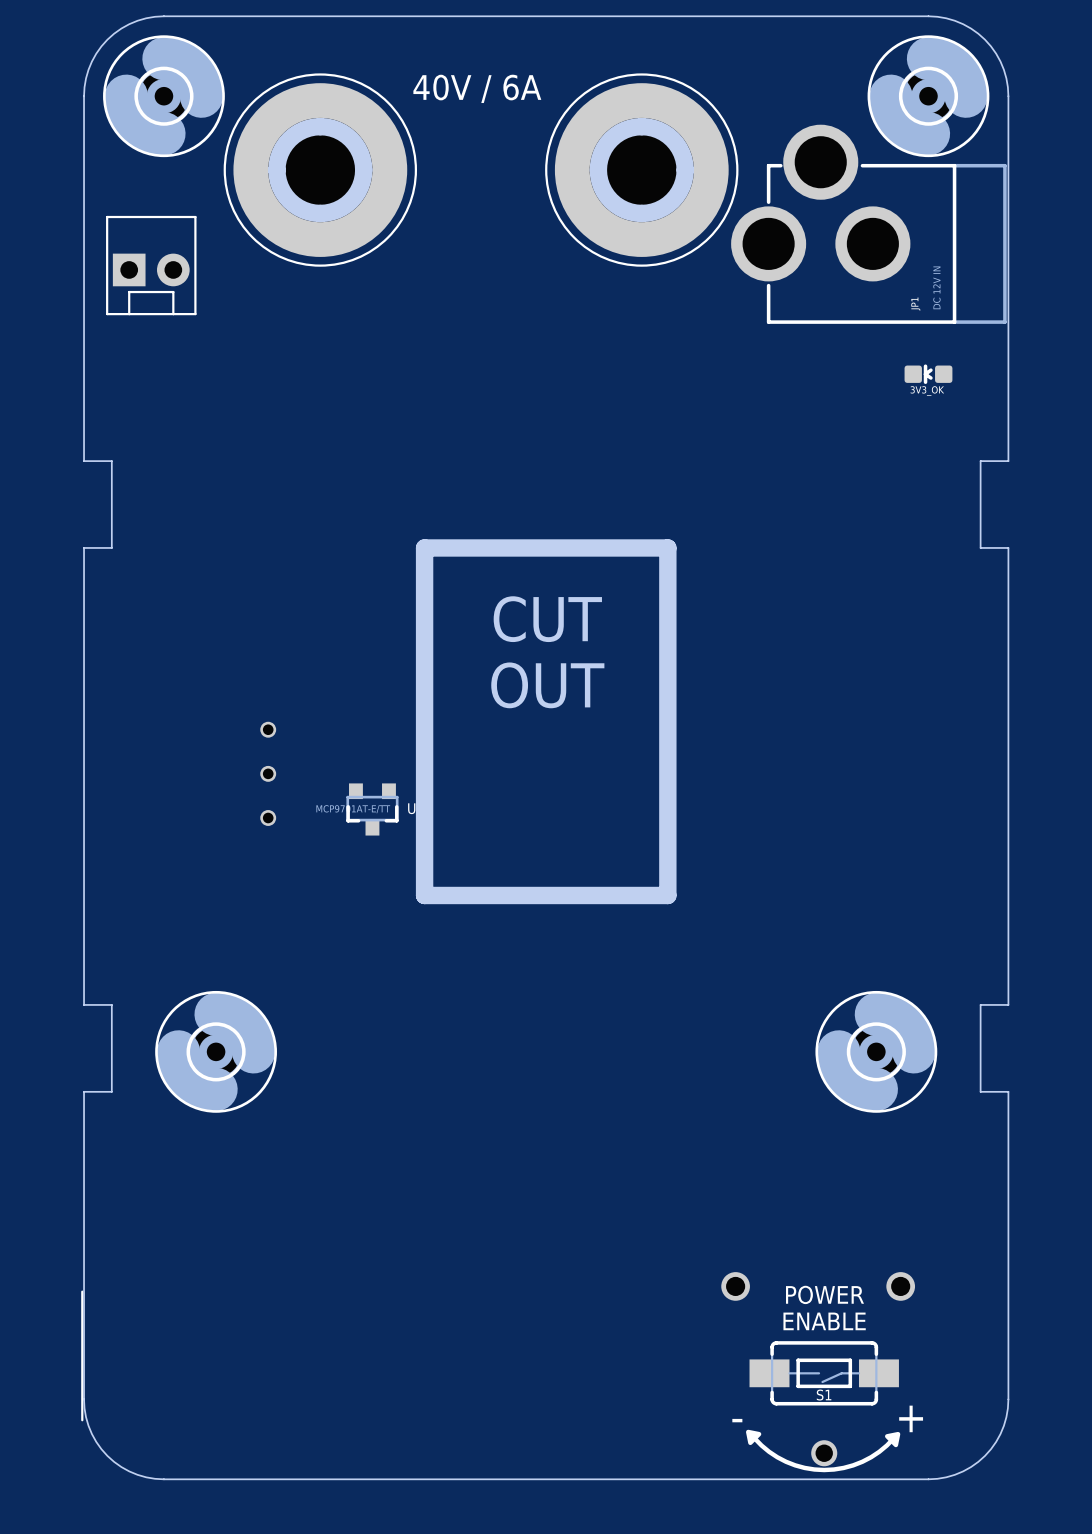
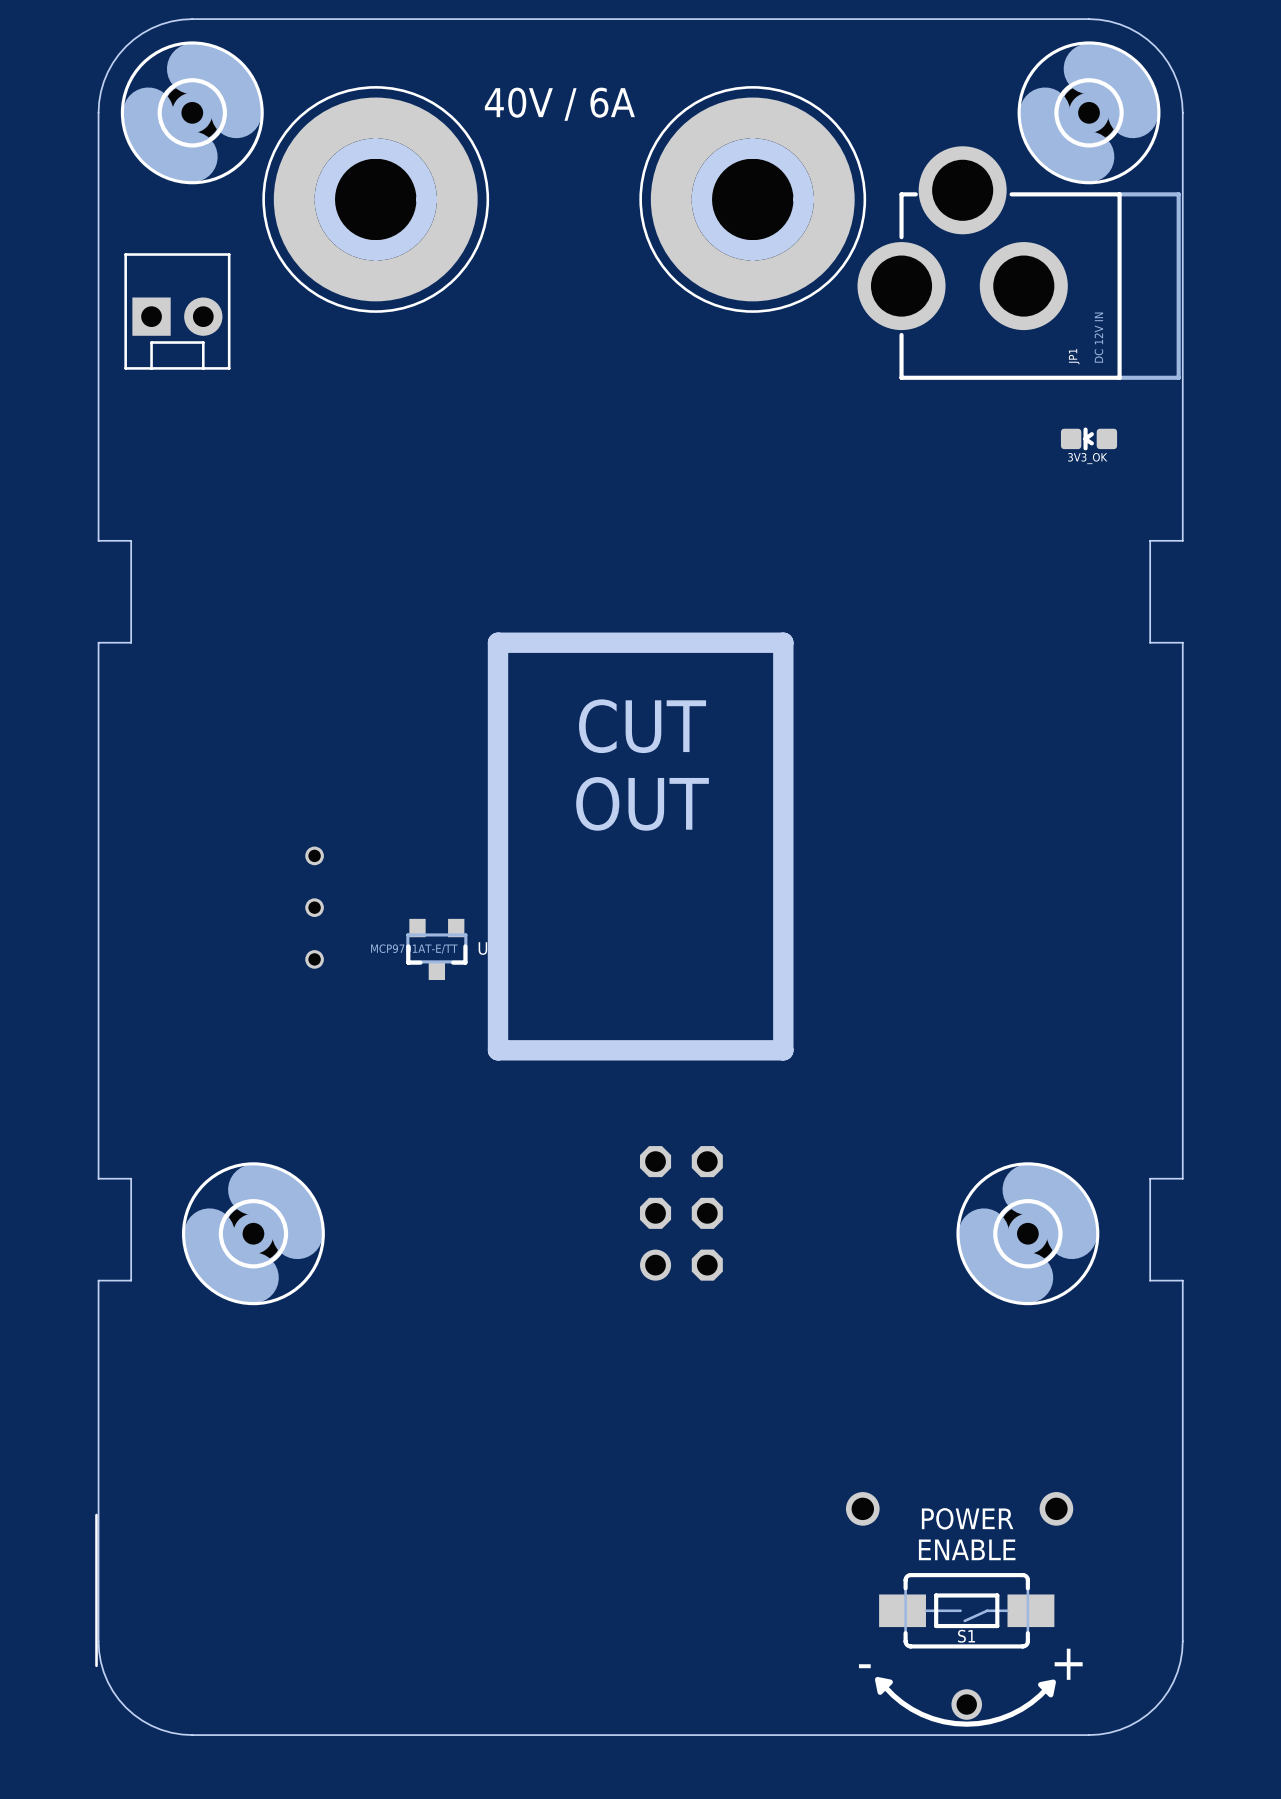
part: none -> (681, 1213)

